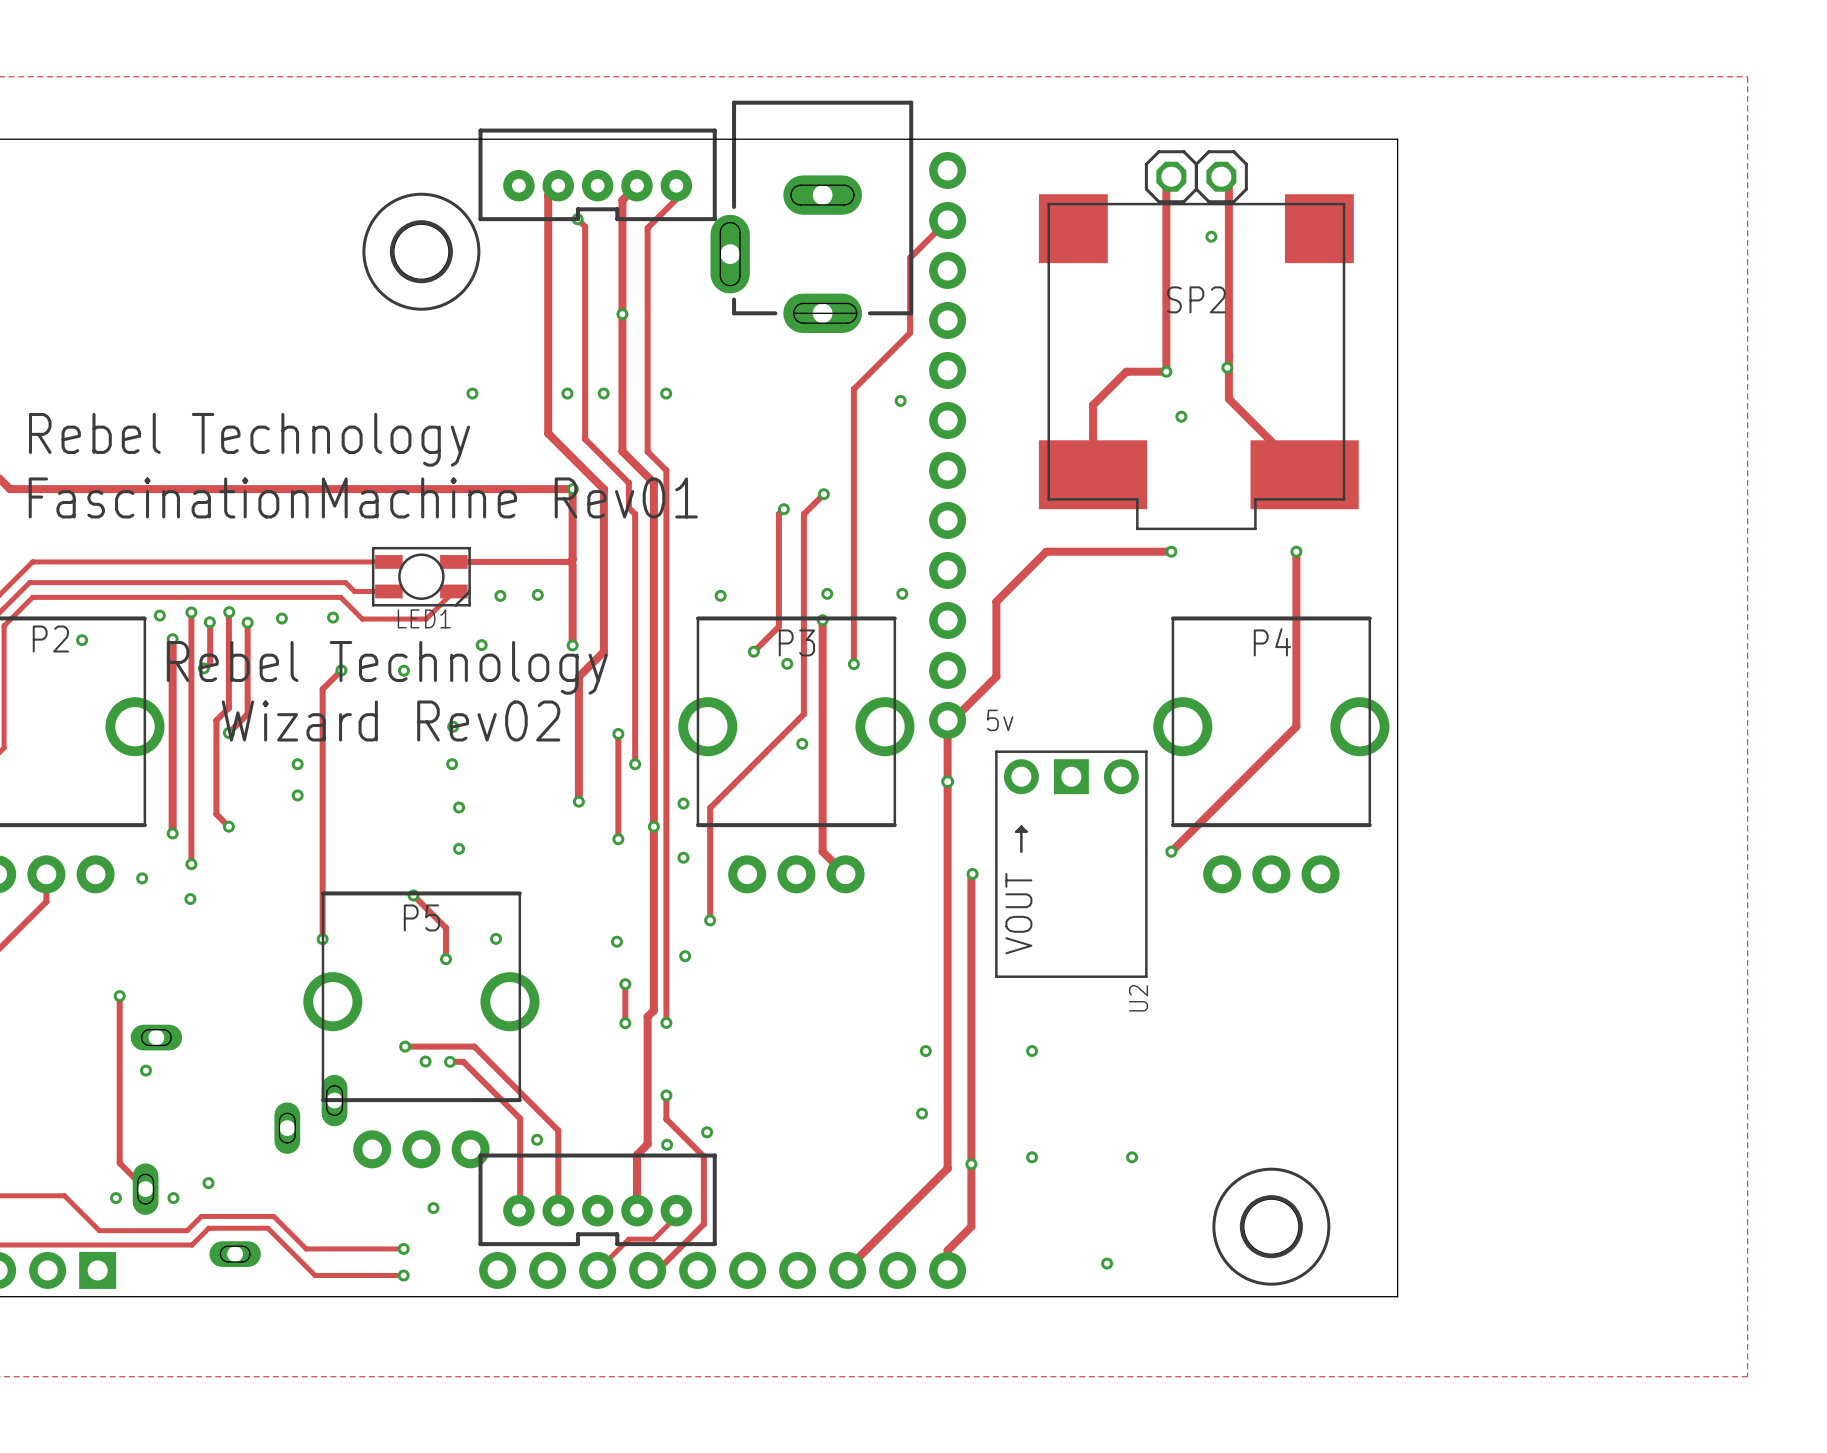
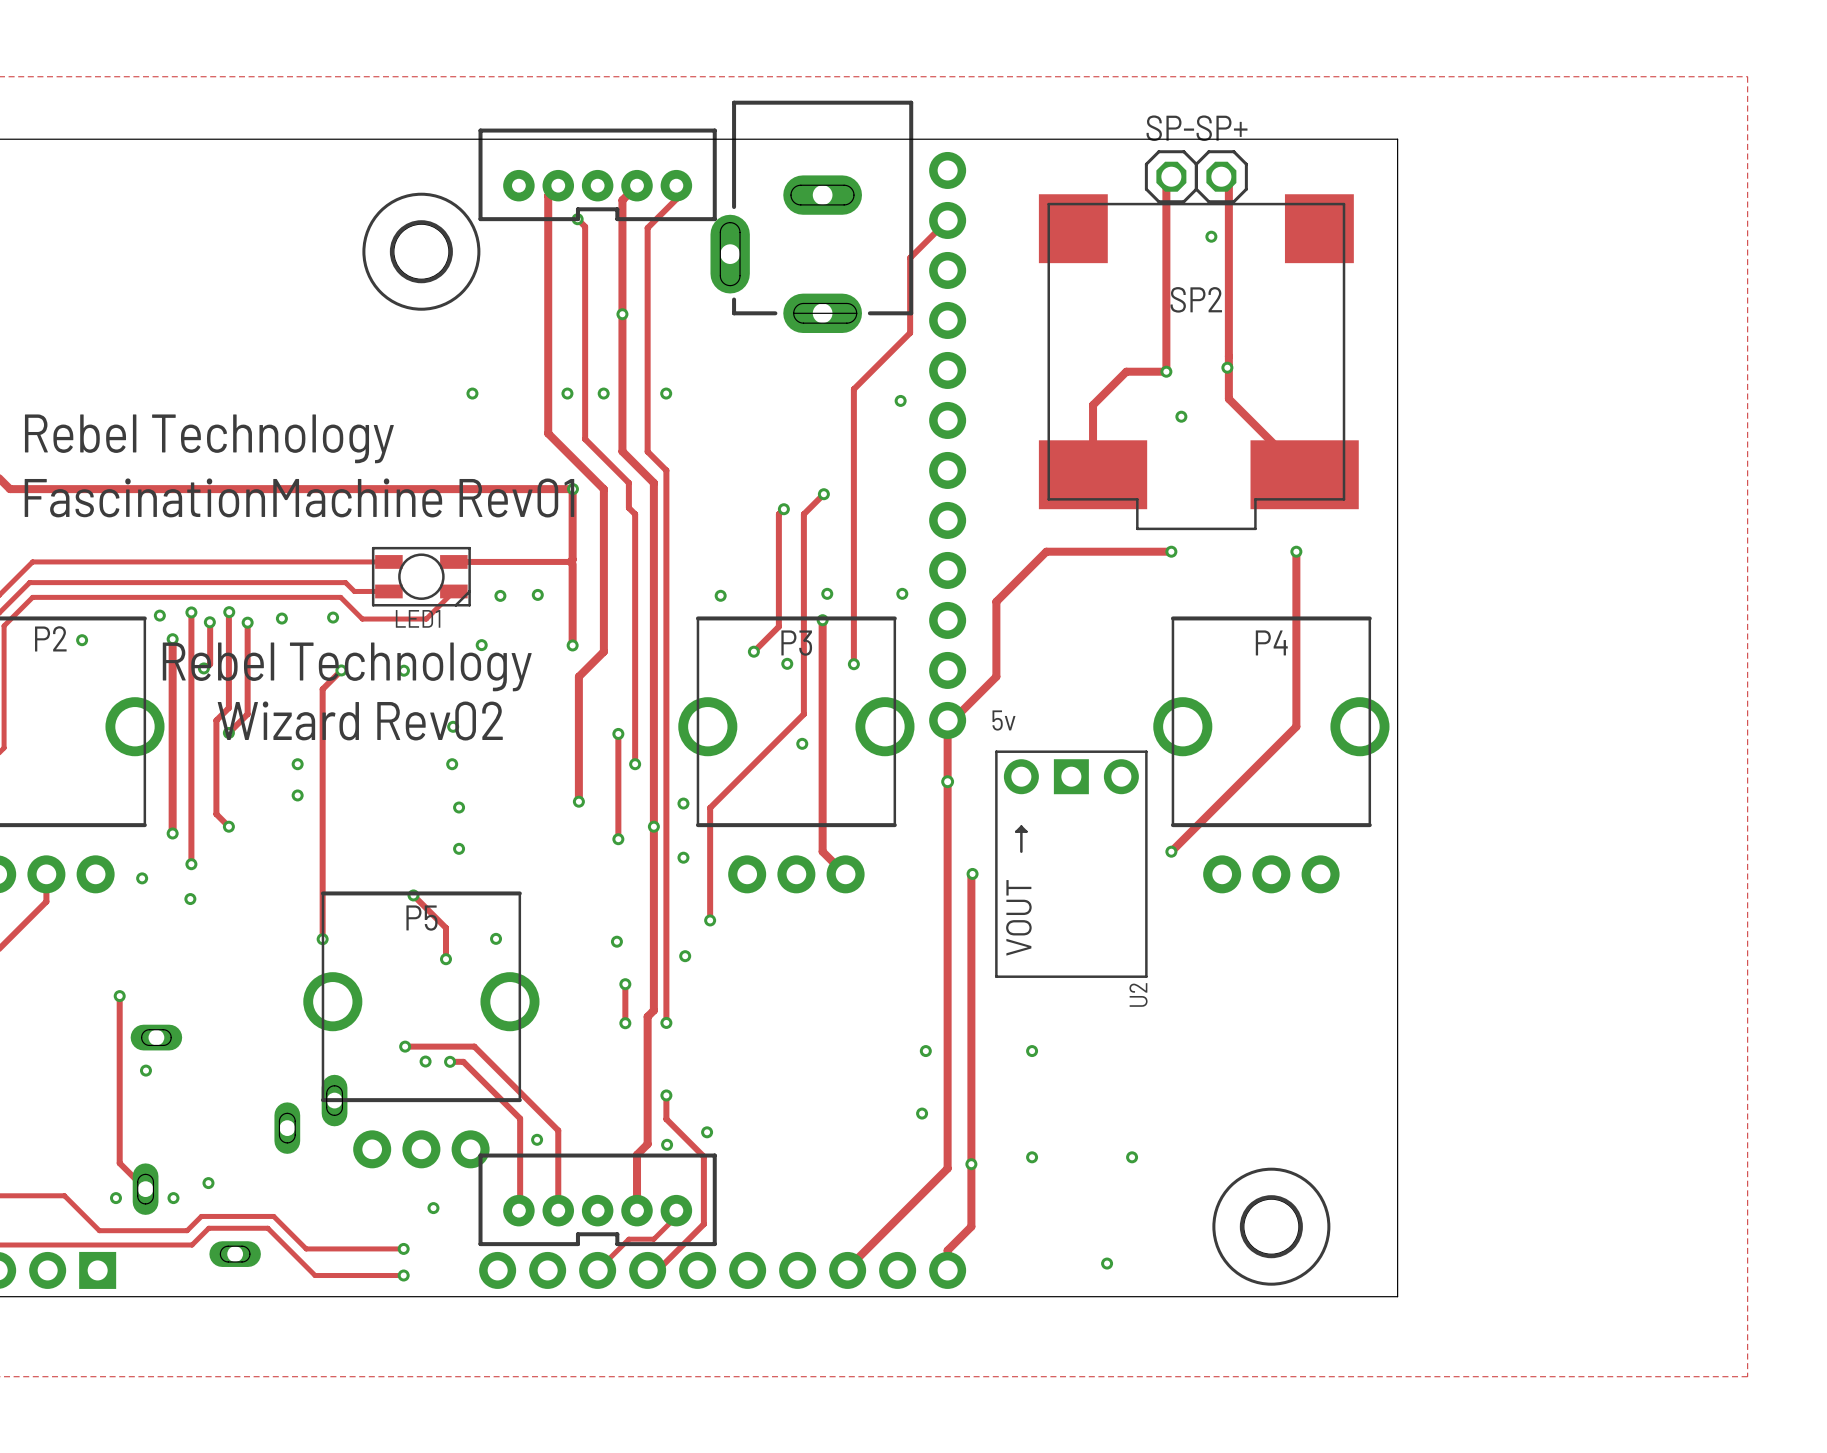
SP- name: none -> SP- (1170, 128)
SP+ name: none -> SP+ (1222, 128)

